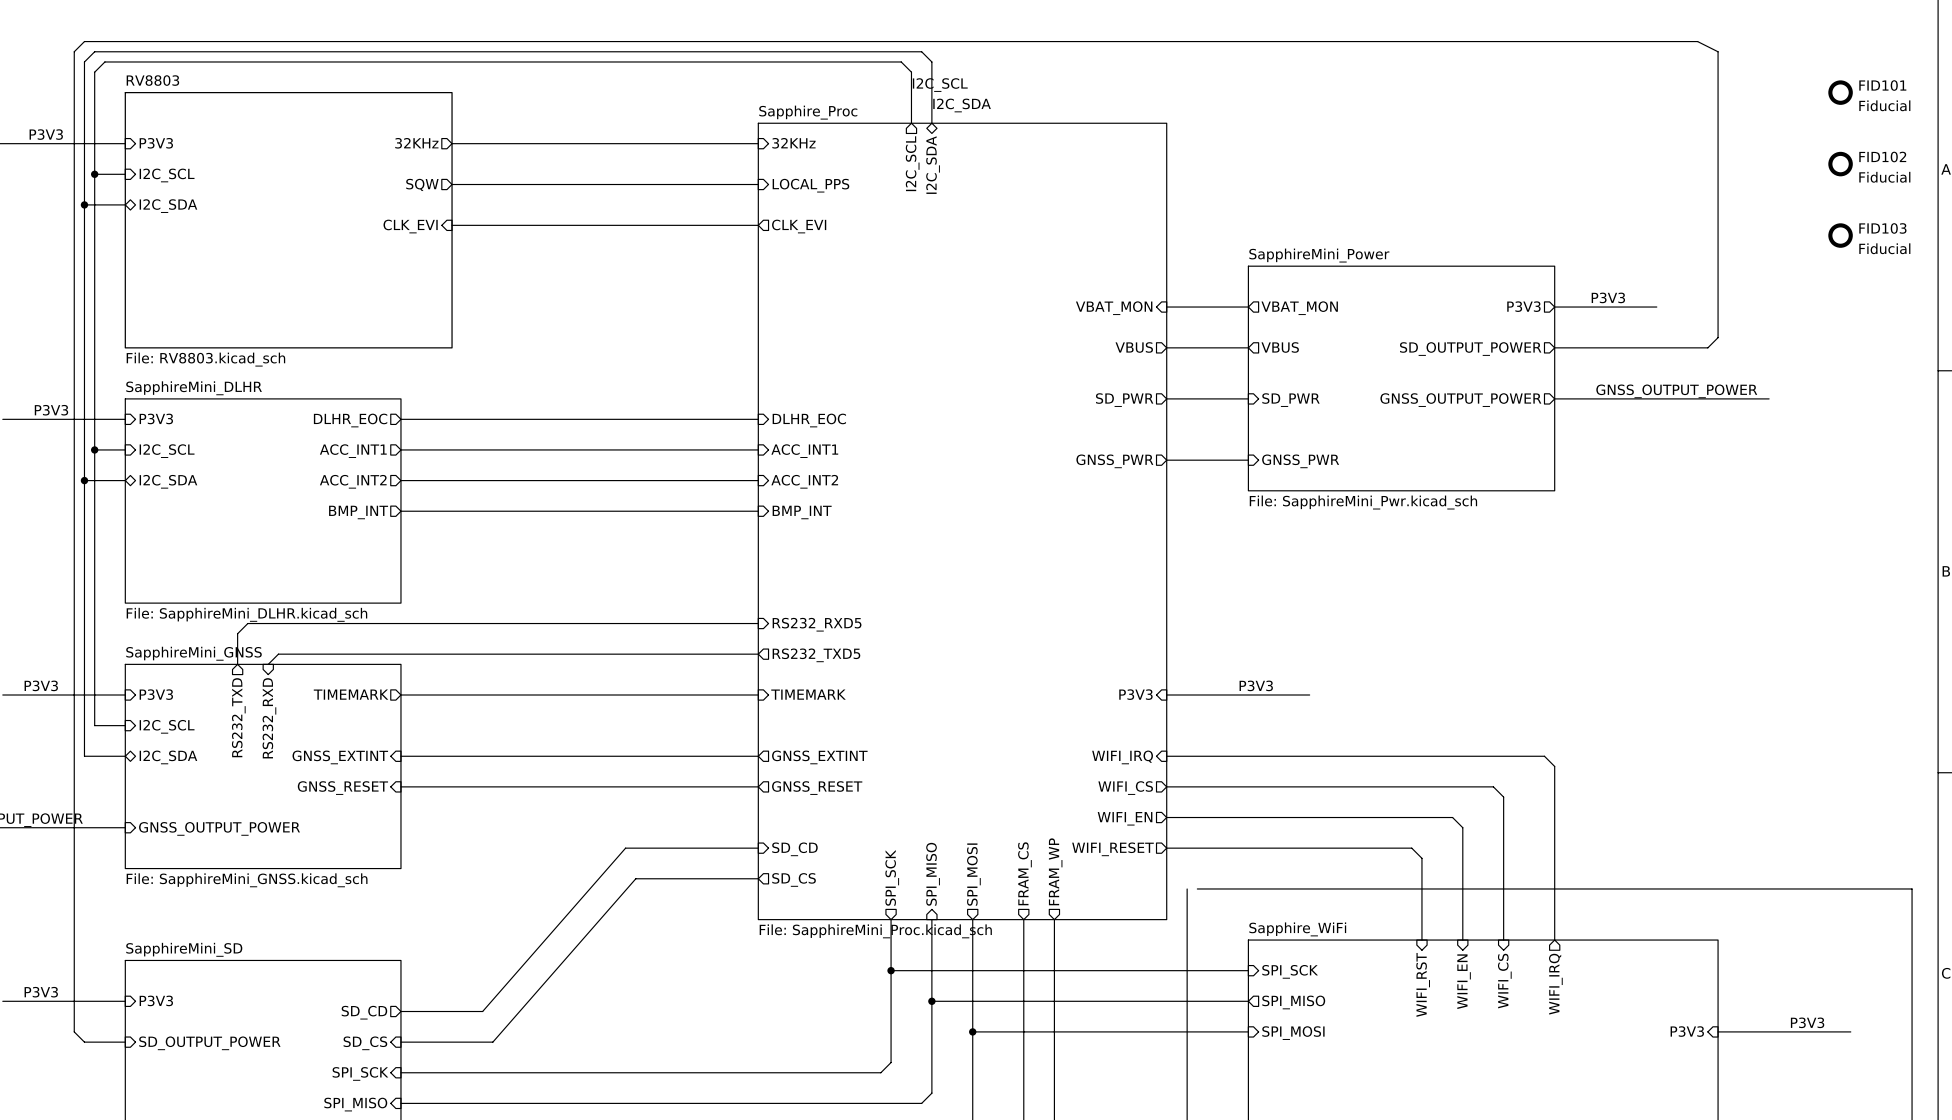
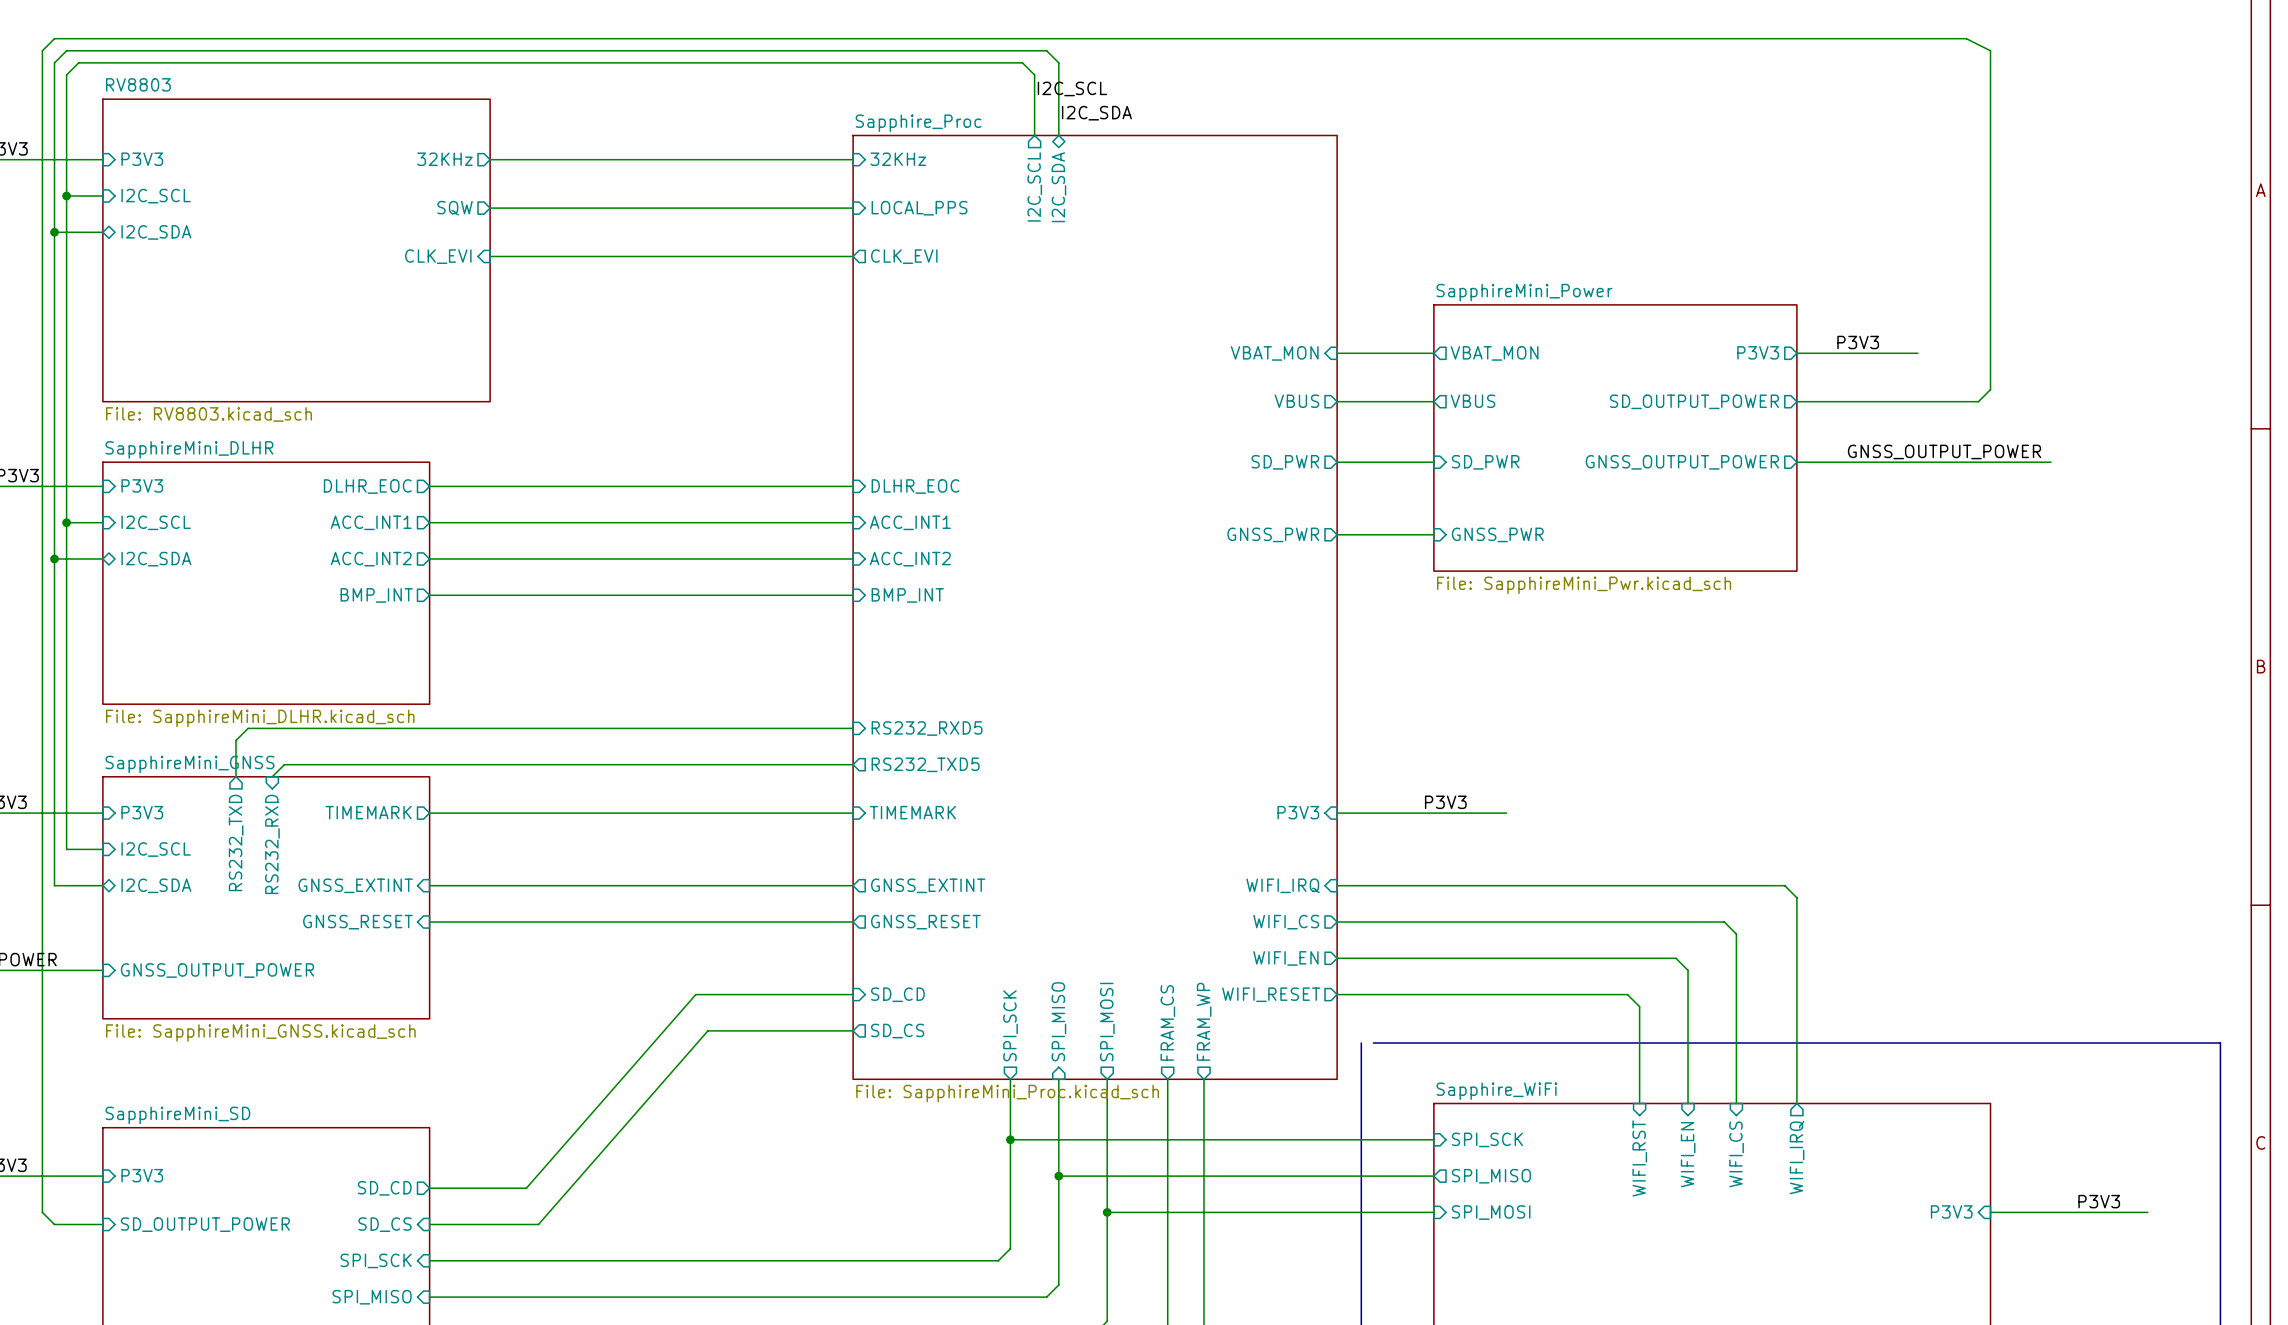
FID101: Fiducial (1840, 92) -> none
FID102: Fiducial (1840, 164) -> none
FID103: Fiducial (1840, 235) -> none

